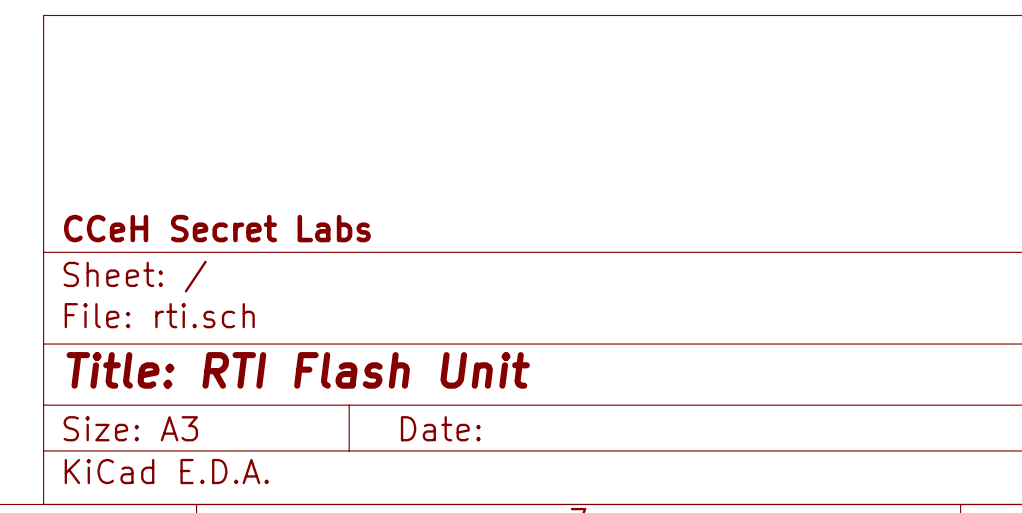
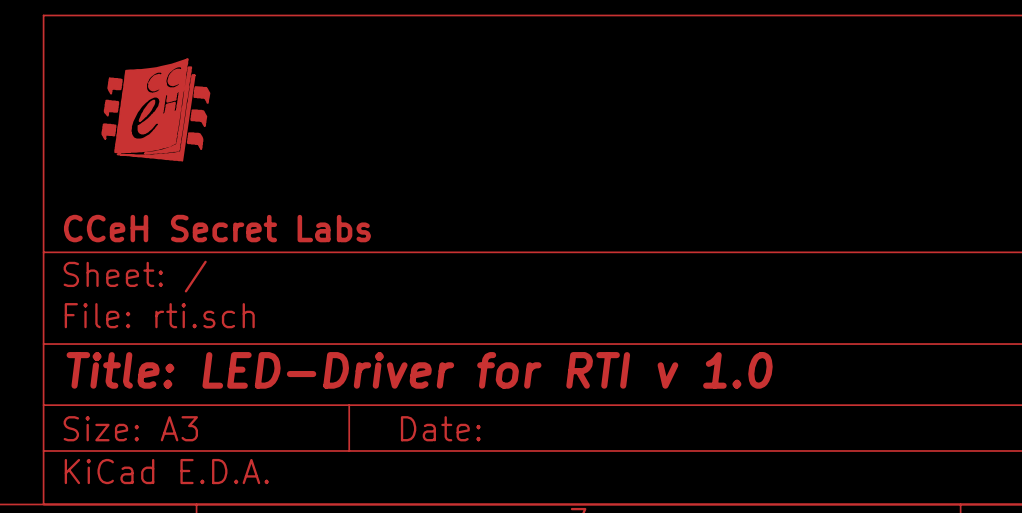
power symbol: none -> (155, 109)
title block: Title: RTI Flash Unit (298, 370) -> Title: LED-Driver for RTI v 1.0 (419, 370)

